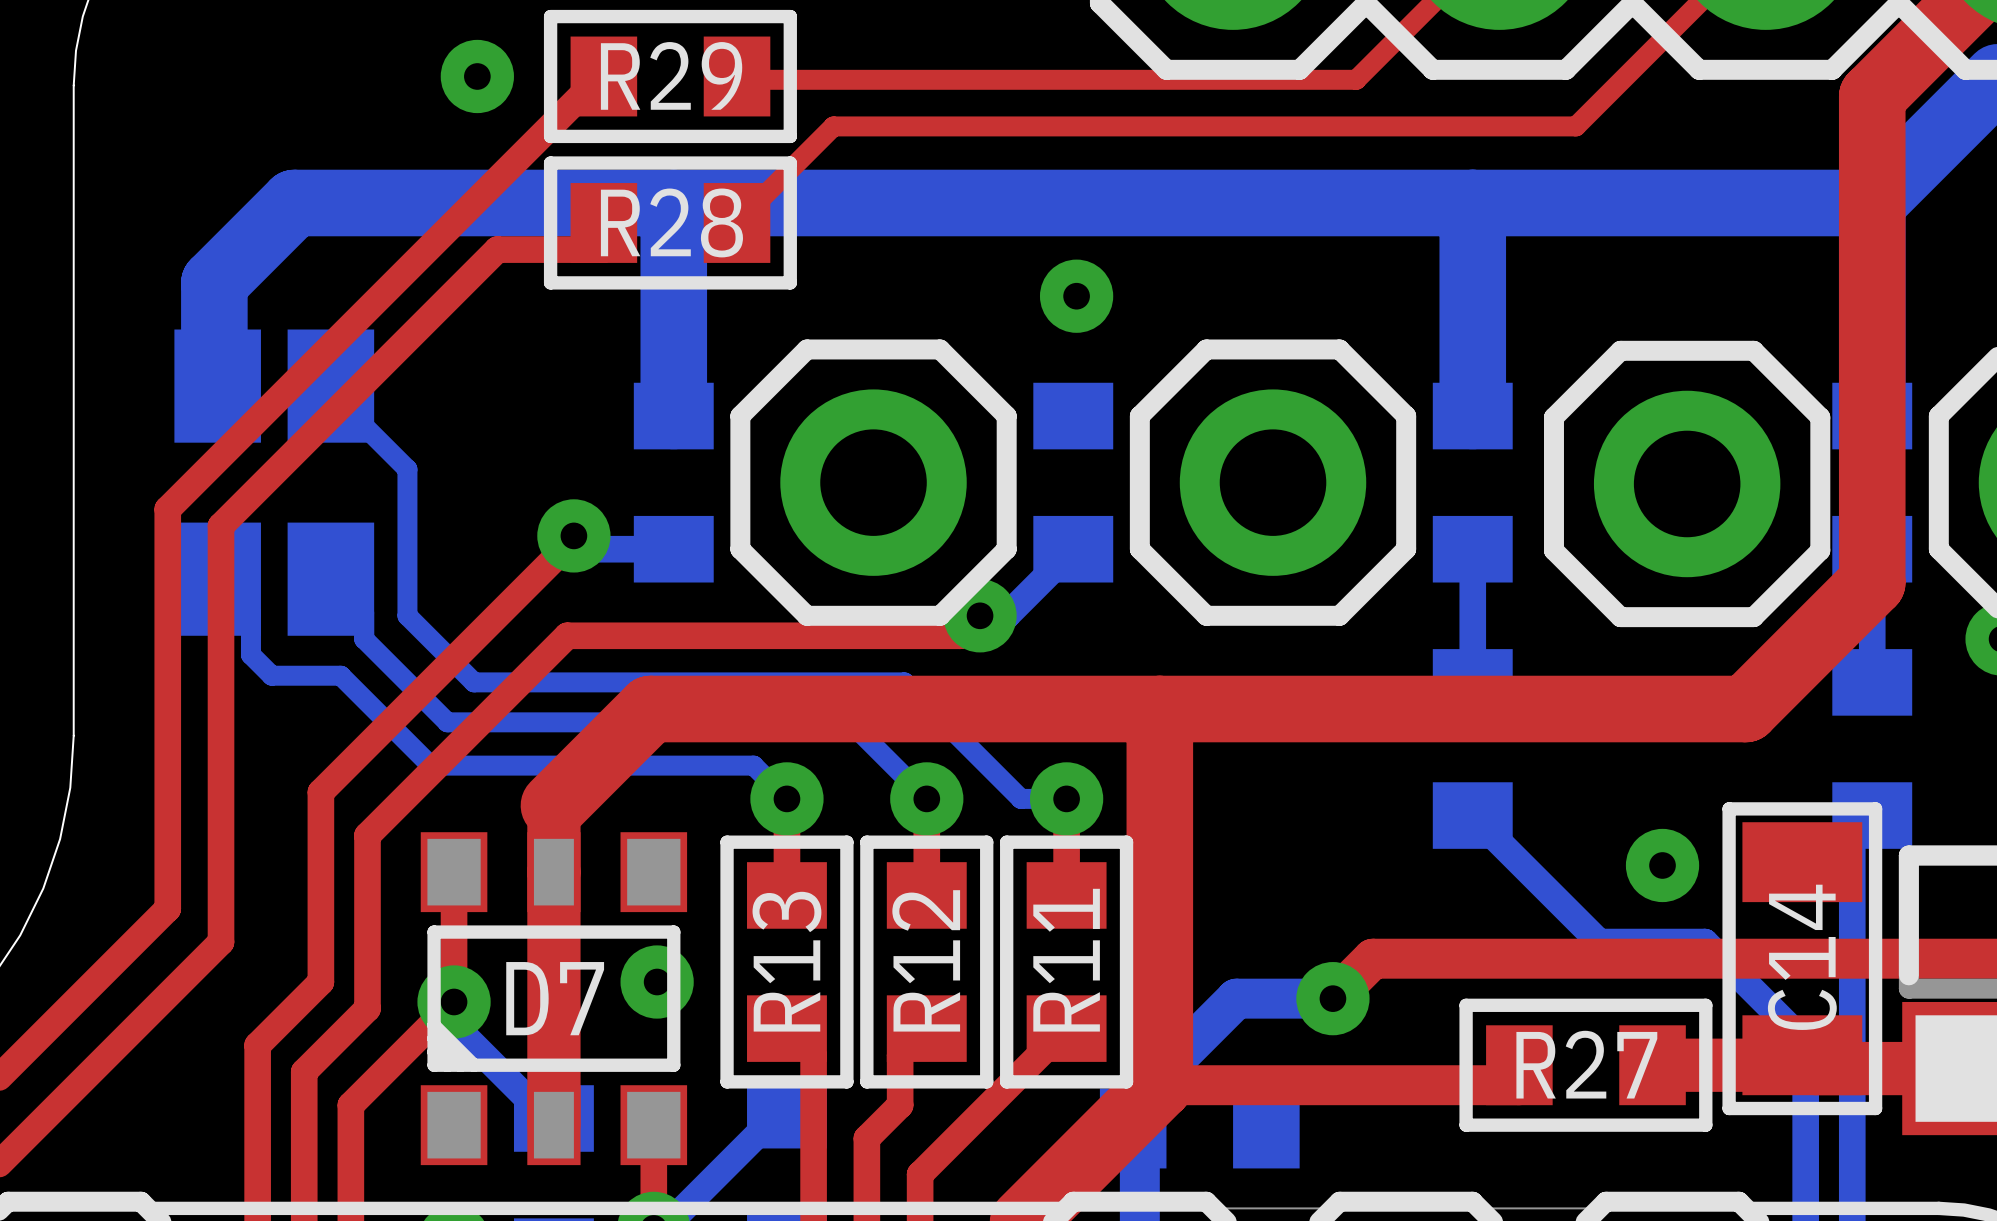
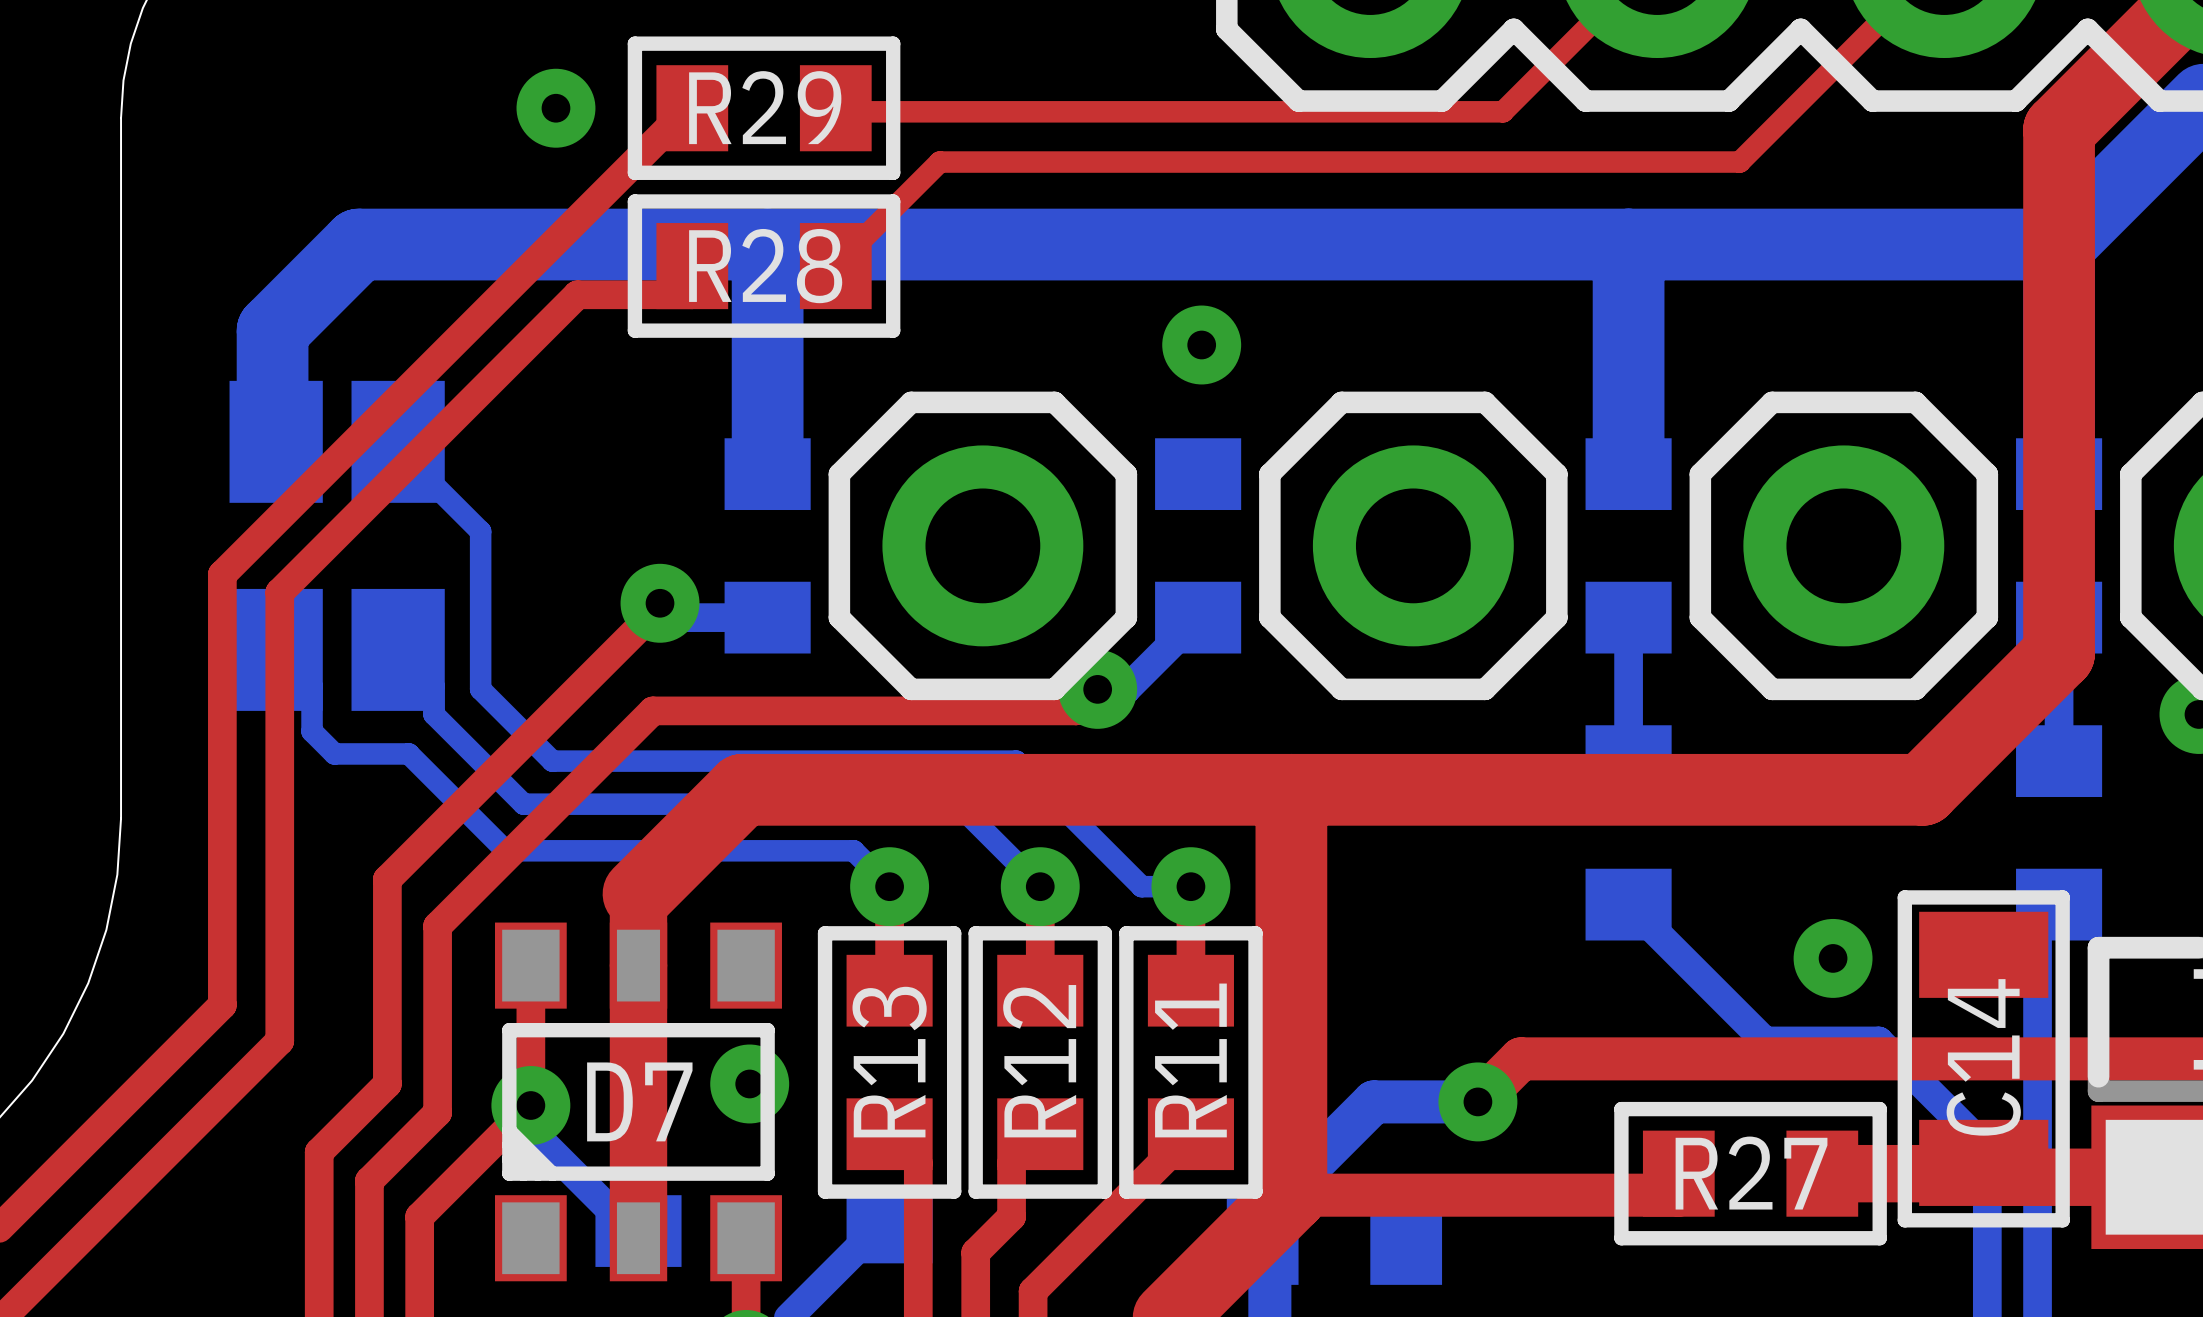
part position: (1687, 483) -> (1843, 545)

